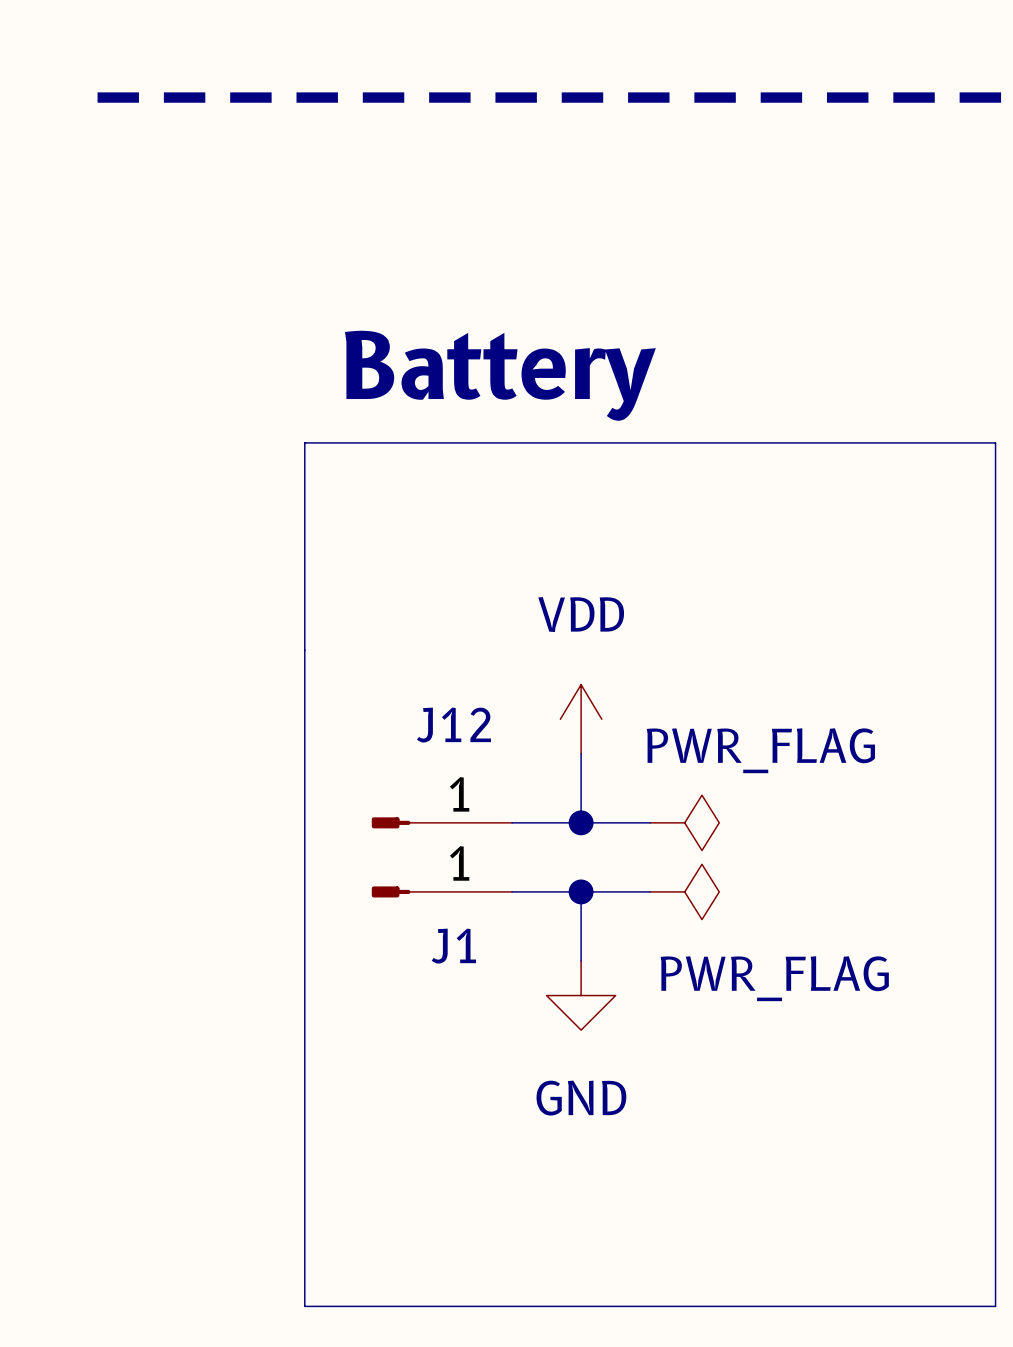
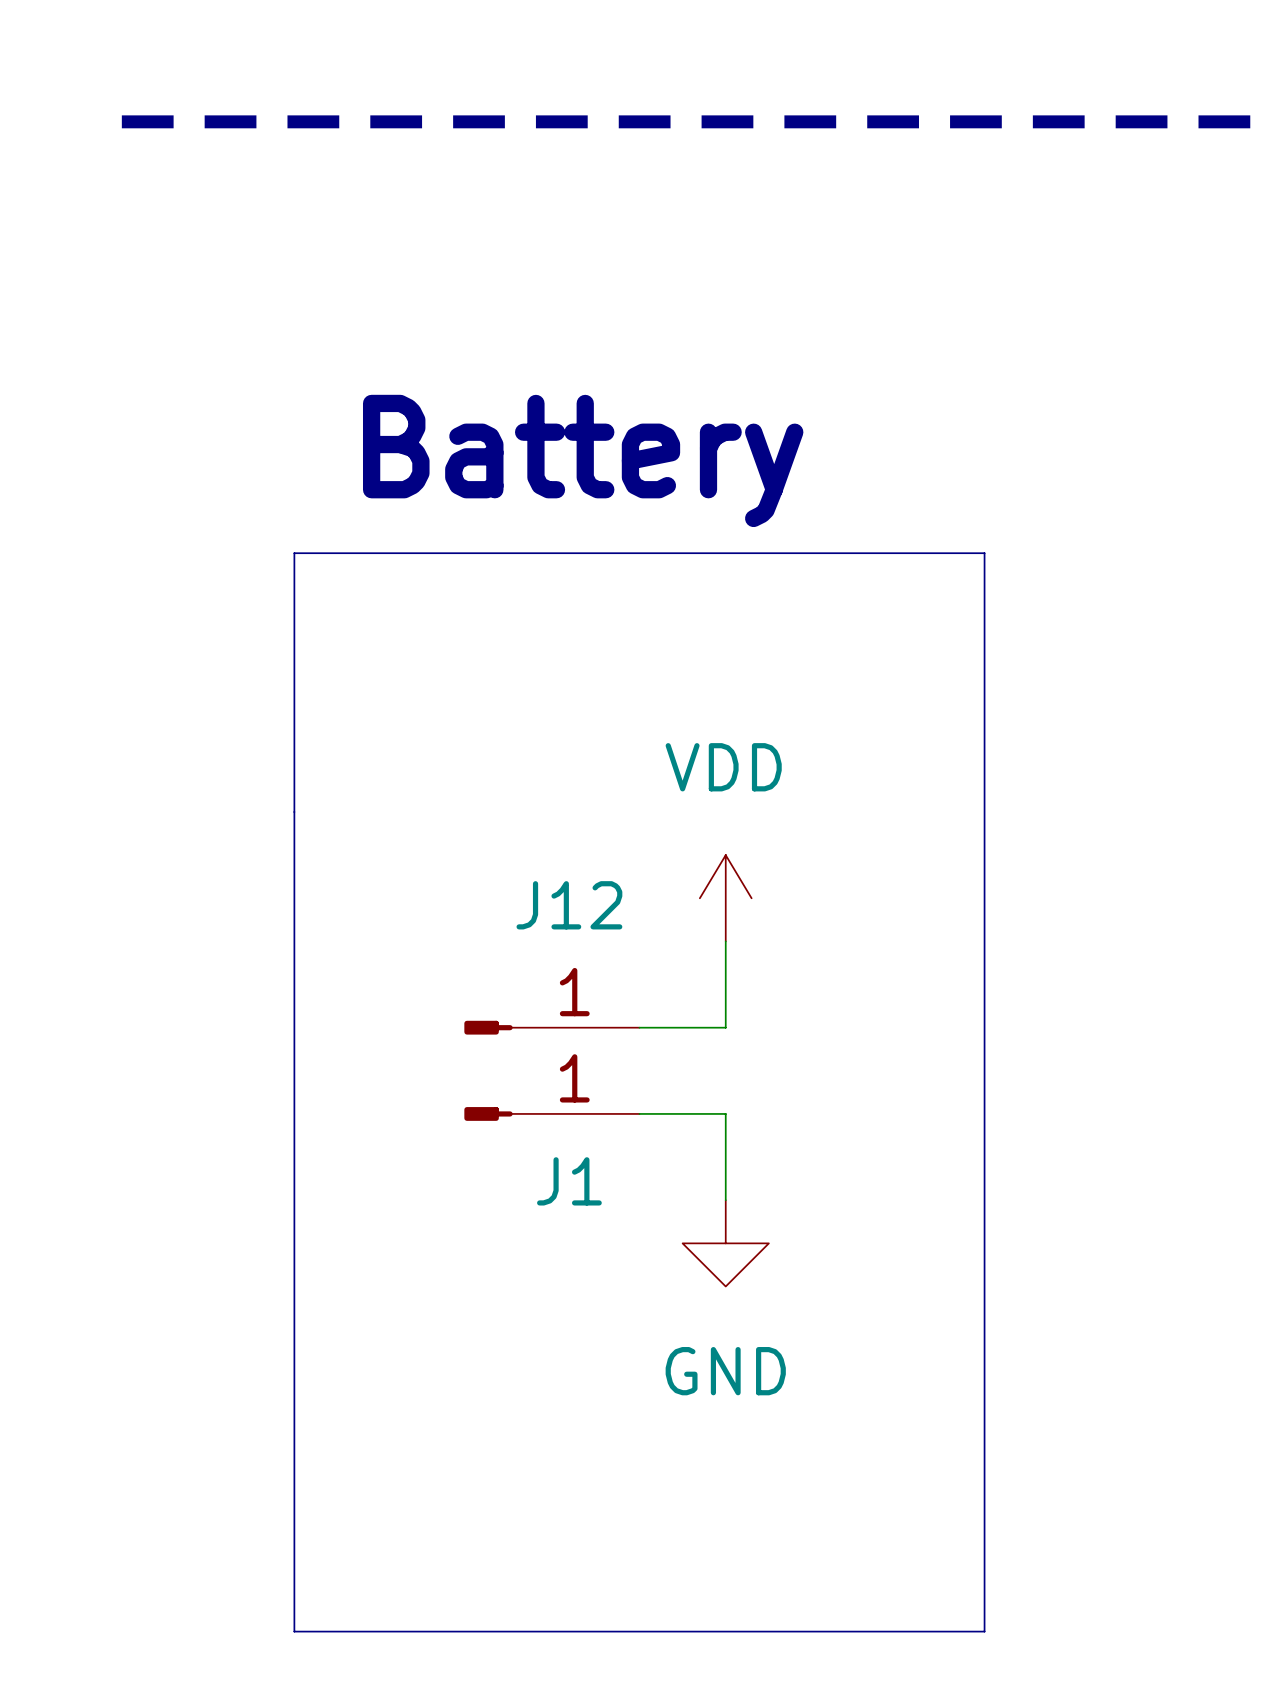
text position: Battery (500, 375) -> Battery (583, 460)
line: (304, 442) (304, 1306) -> (380, 553) (294, 553) (294, 1631) (380, 1631)
line: (788, 442) (995, 442) (995, 1306) (788, 1306) -> (984, 553) (984, 1631)
wire: (581, 822) (650, 822) -> none
junction: (581, 822) -> none
power symbol: PWR_FLAG (684, 822) -> none
wire: (581, 891) (650, 891) -> none
junction: (581, 891) -> none
power symbol: PWR_FLAG (684, 891) -> none

